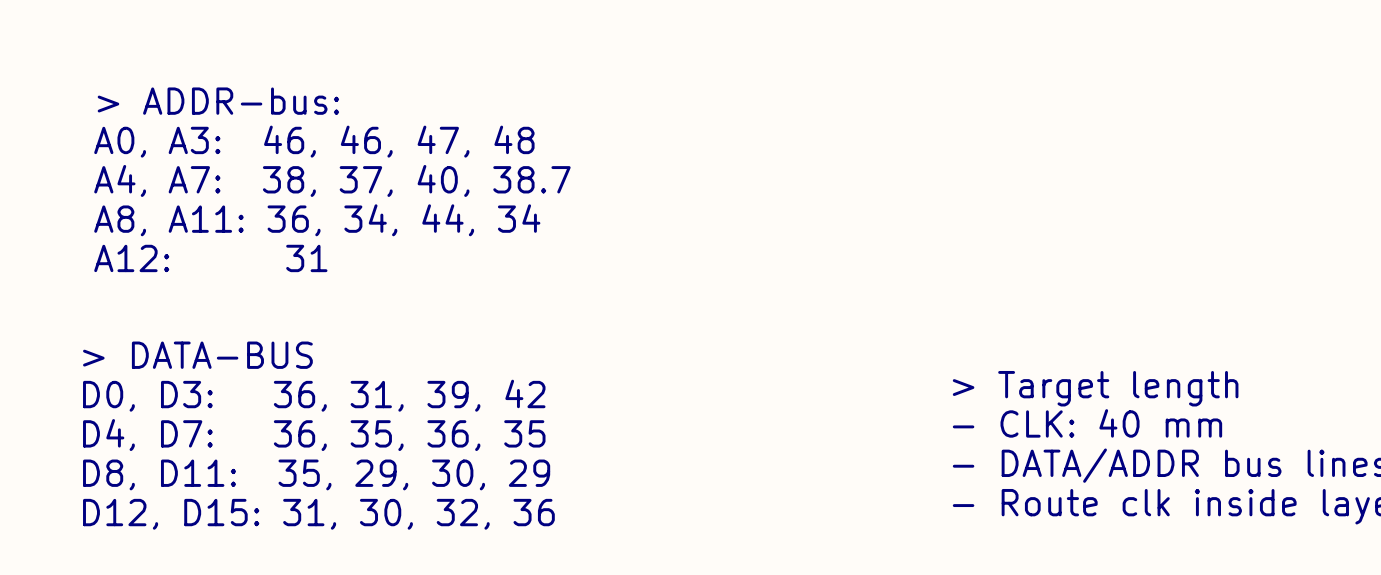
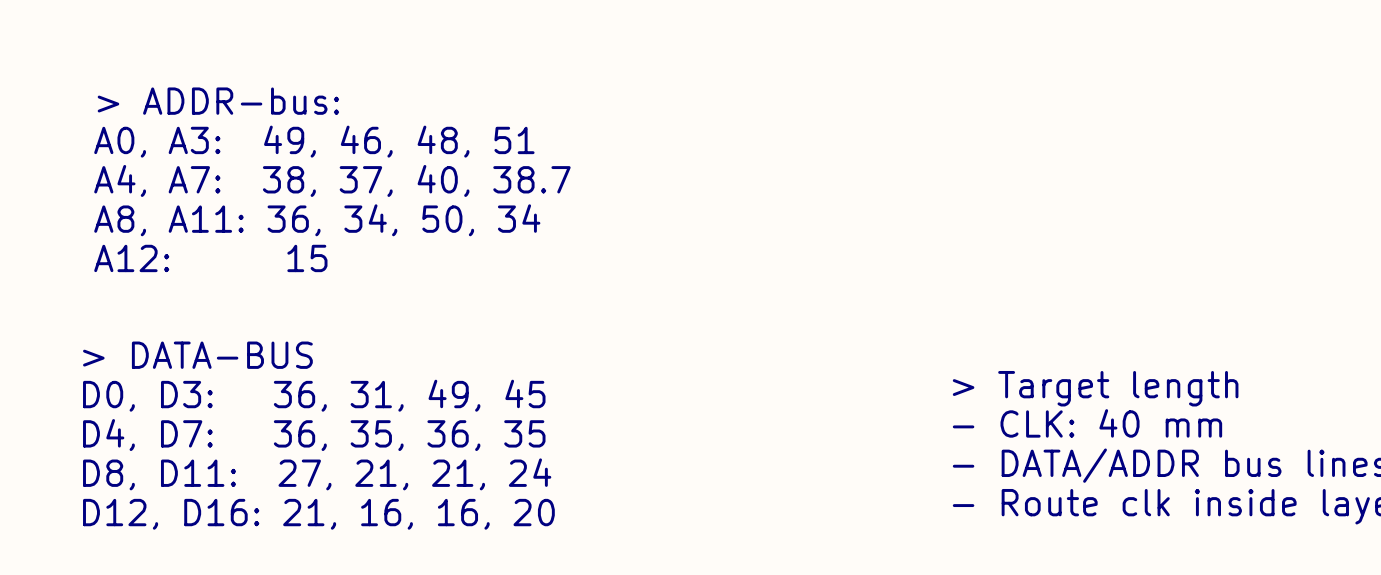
text: A0, A3: 46, 46, 47, 48 (314, 141) -> A0, A3: 49, 46, 48, 51 (314, 141)
text: A8, A11: 36, 34, 44, 34 (317, 220) -> A8, A11: 36, 34, 50, 34 (317, 220)
text: A12: 31 (210, 258) -> A12: 15 (210, 258)
text: D0, D3: 36, 31, 39, 42 (314, 395) -> D0, D3: 36, 31, 49, 45 (314, 395)
text: D8, D11: 35, 29, 30, 29 (316, 474) -> D8, D11: 27, 21, 21, 24 (317, 474)
text: D12, D15: 31, 30, 32, 36 (318, 514) -> D12, D16: 21, 16, 16, 20 (318, 514)

